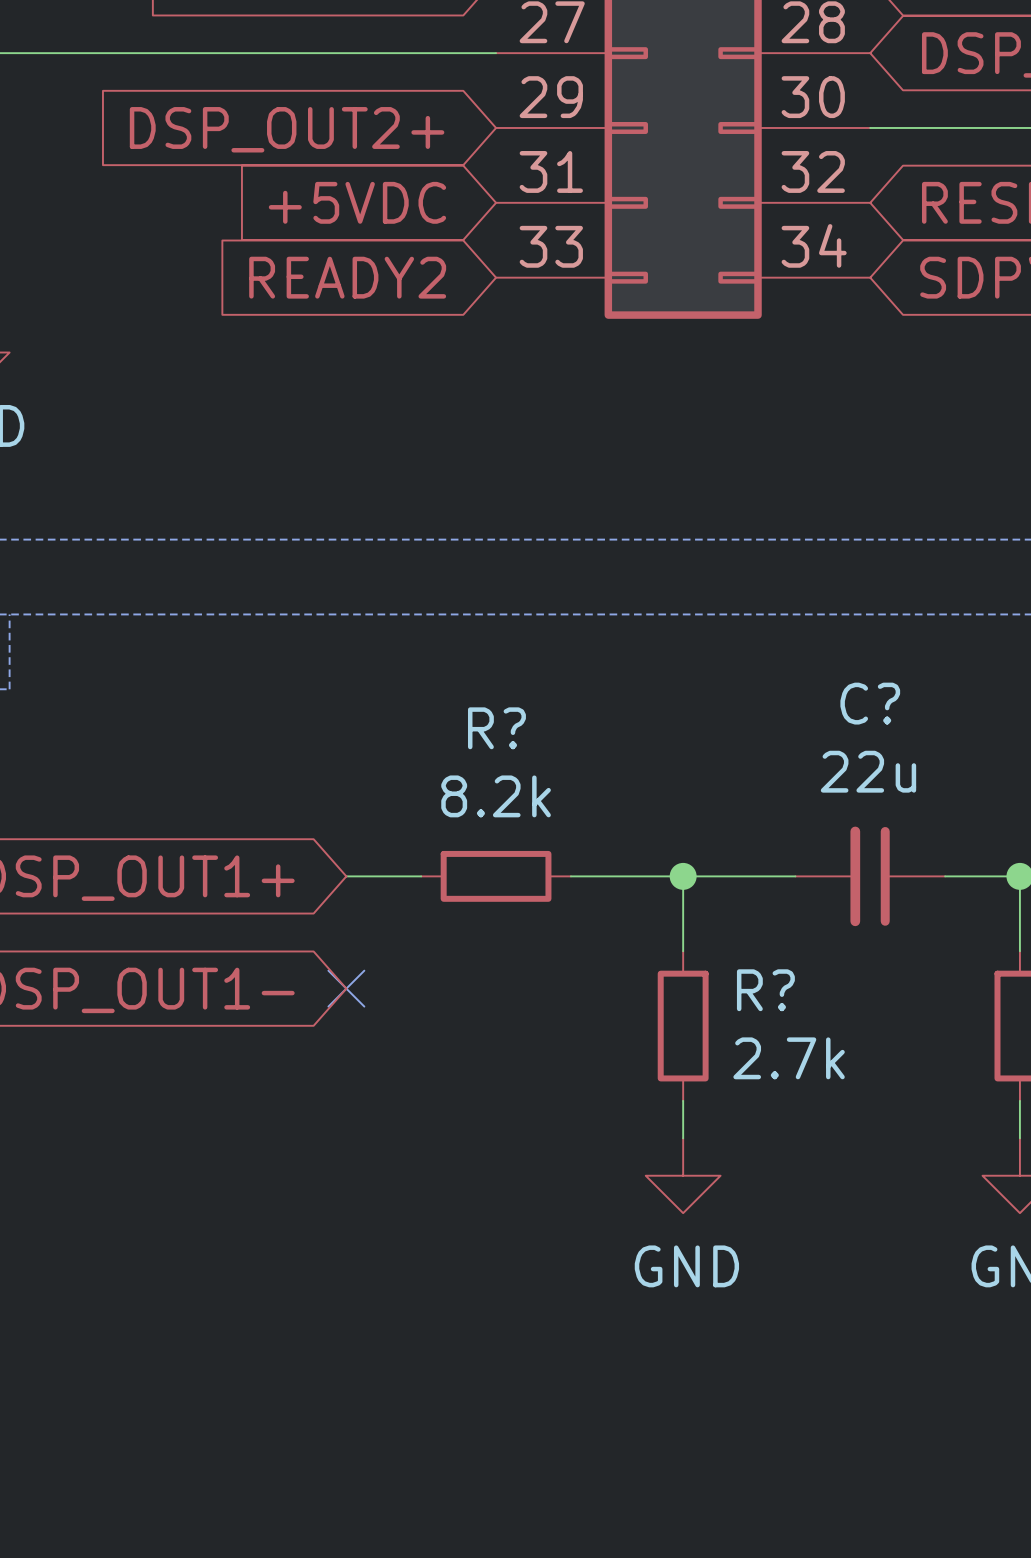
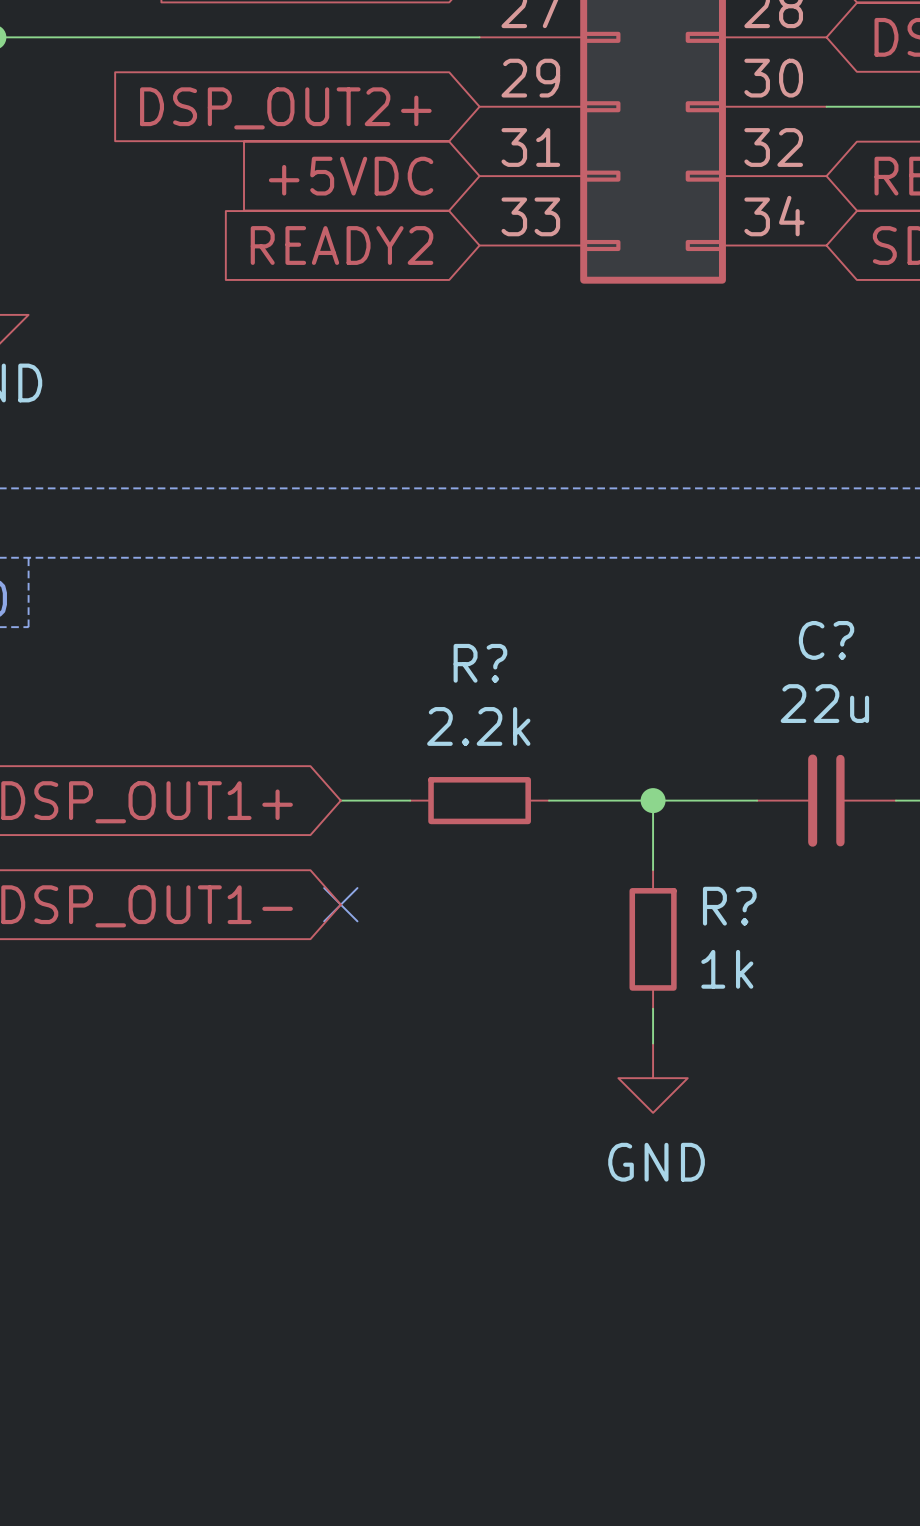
R? value: 8.2k (496, 796) -> 2.2k (478, 726)
R? value: 2.7k (789, 1058) -> 1k (727, 969)

